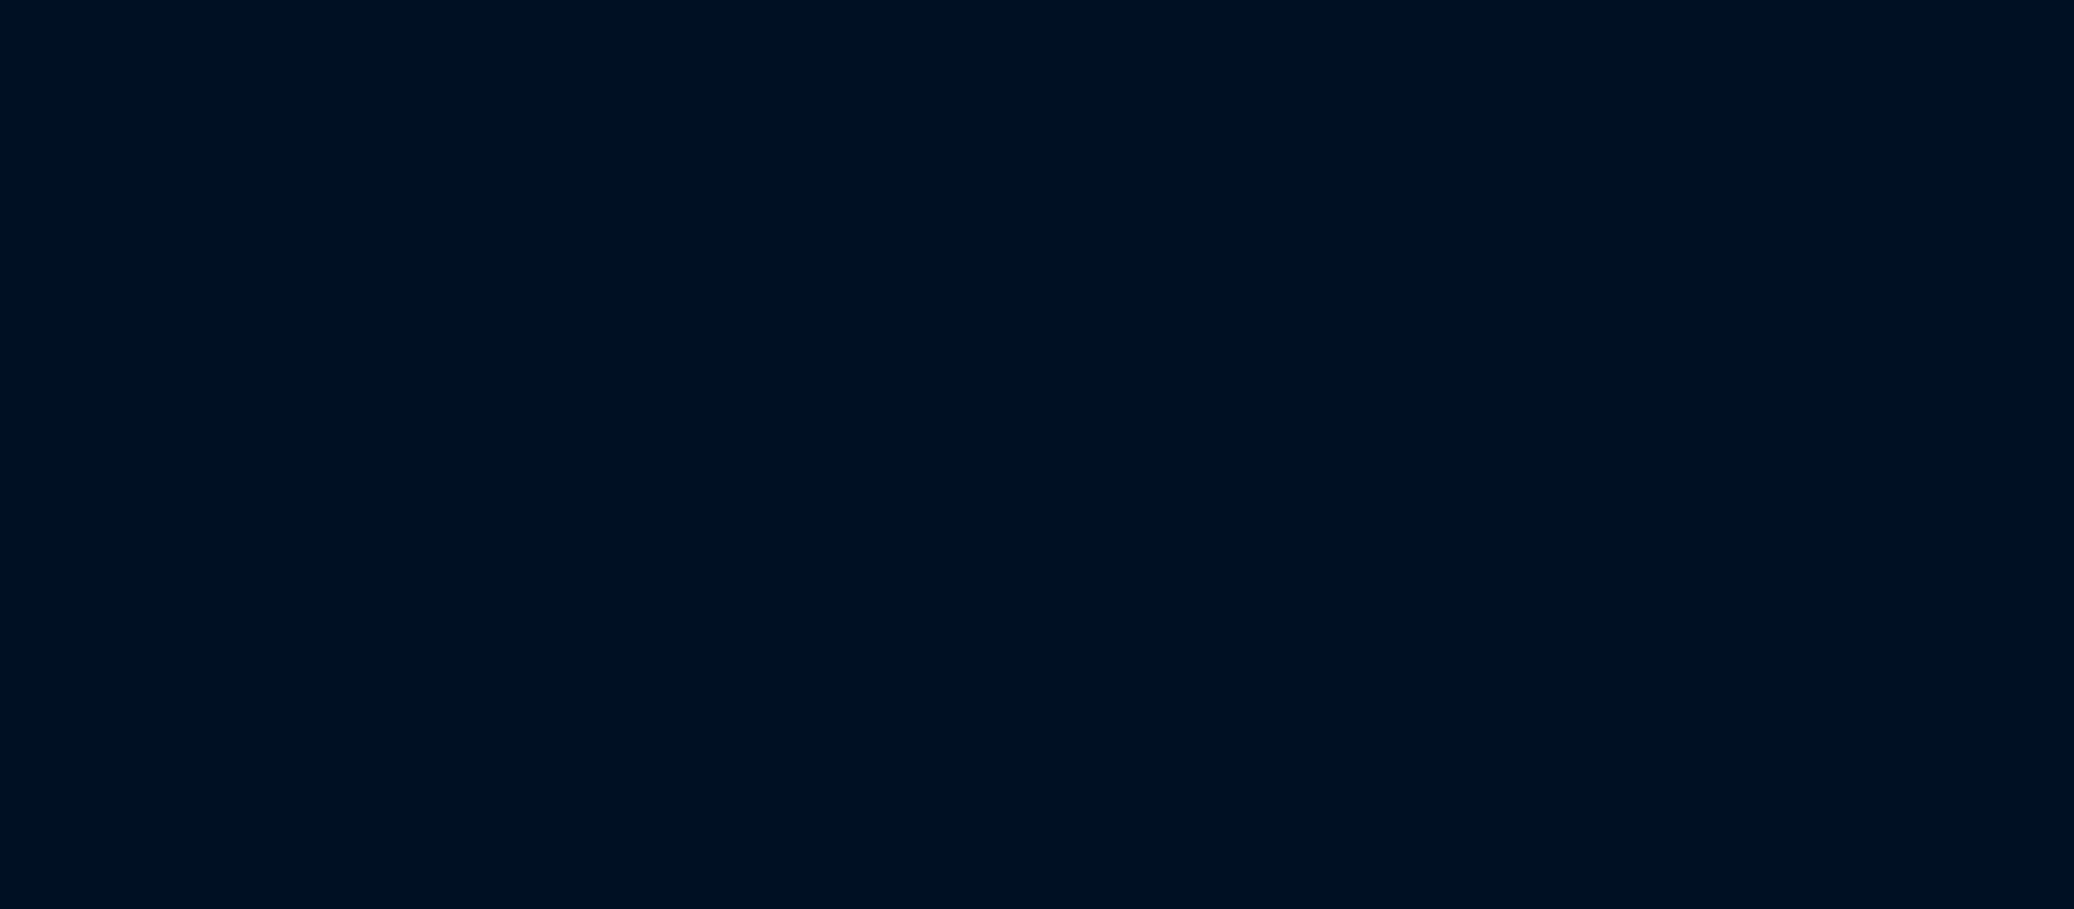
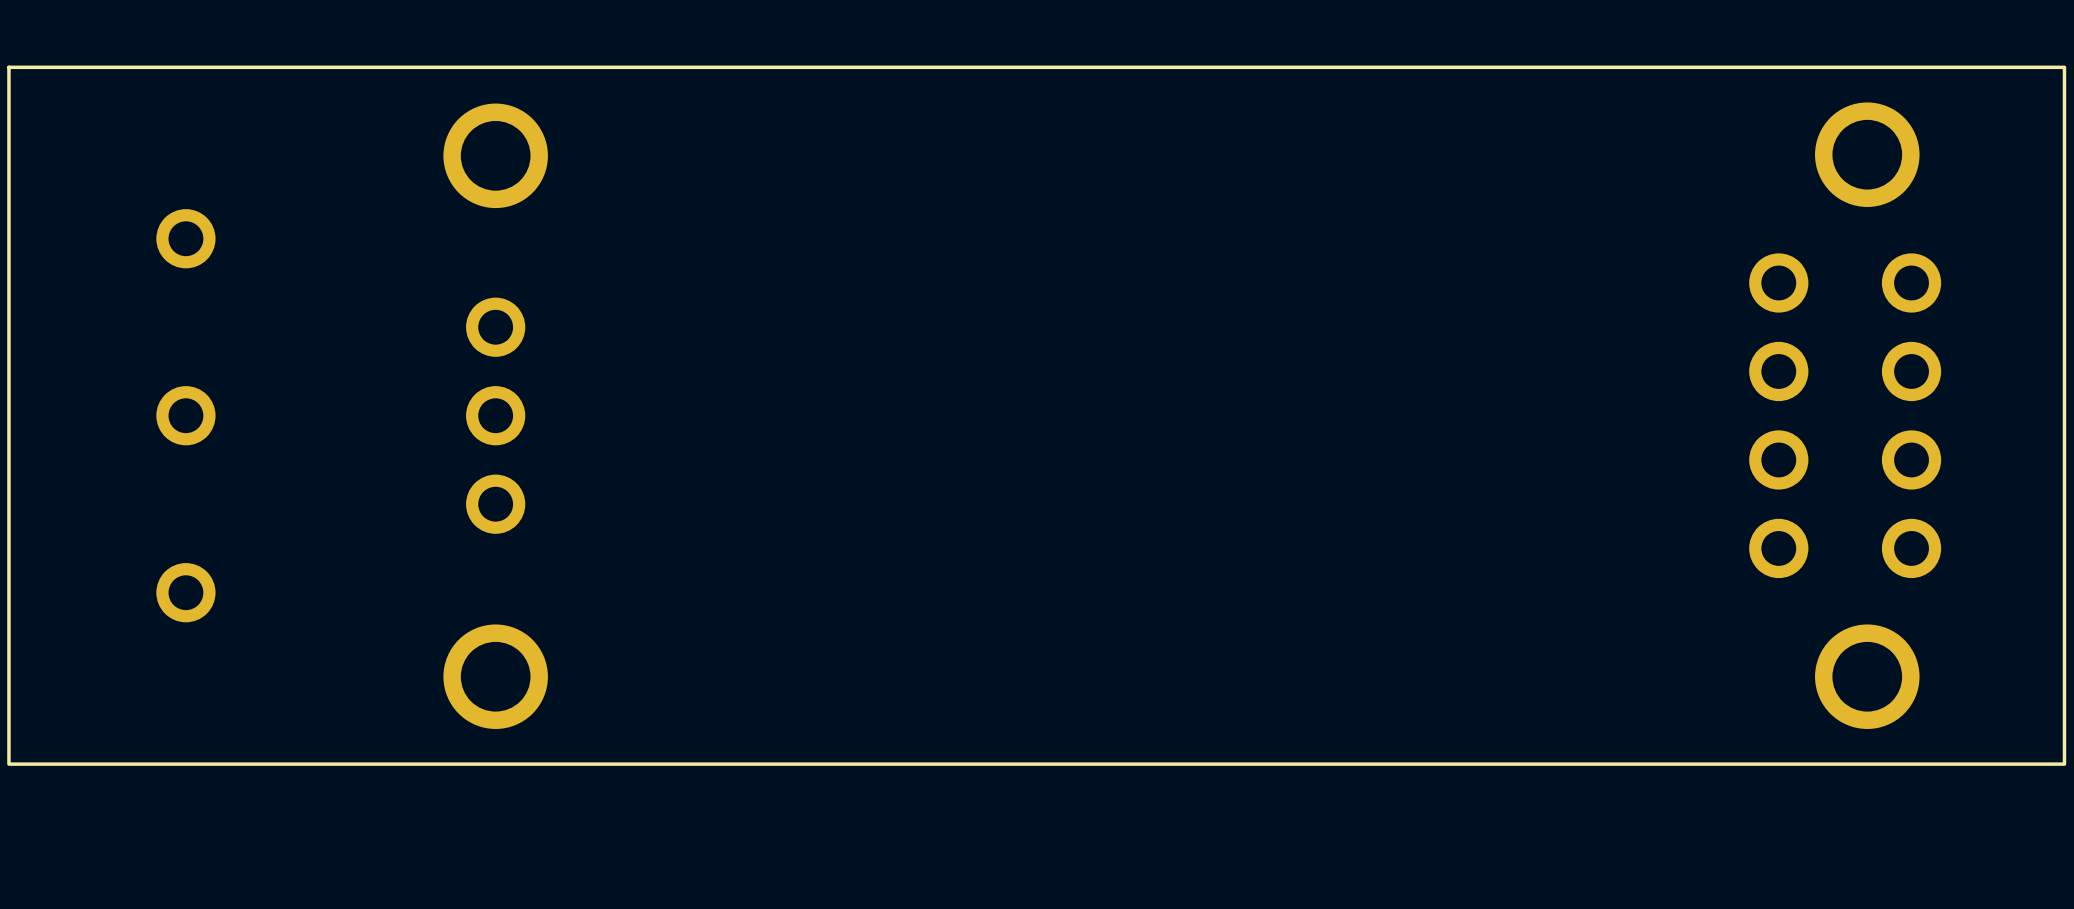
part: none -> (1036, 415)

